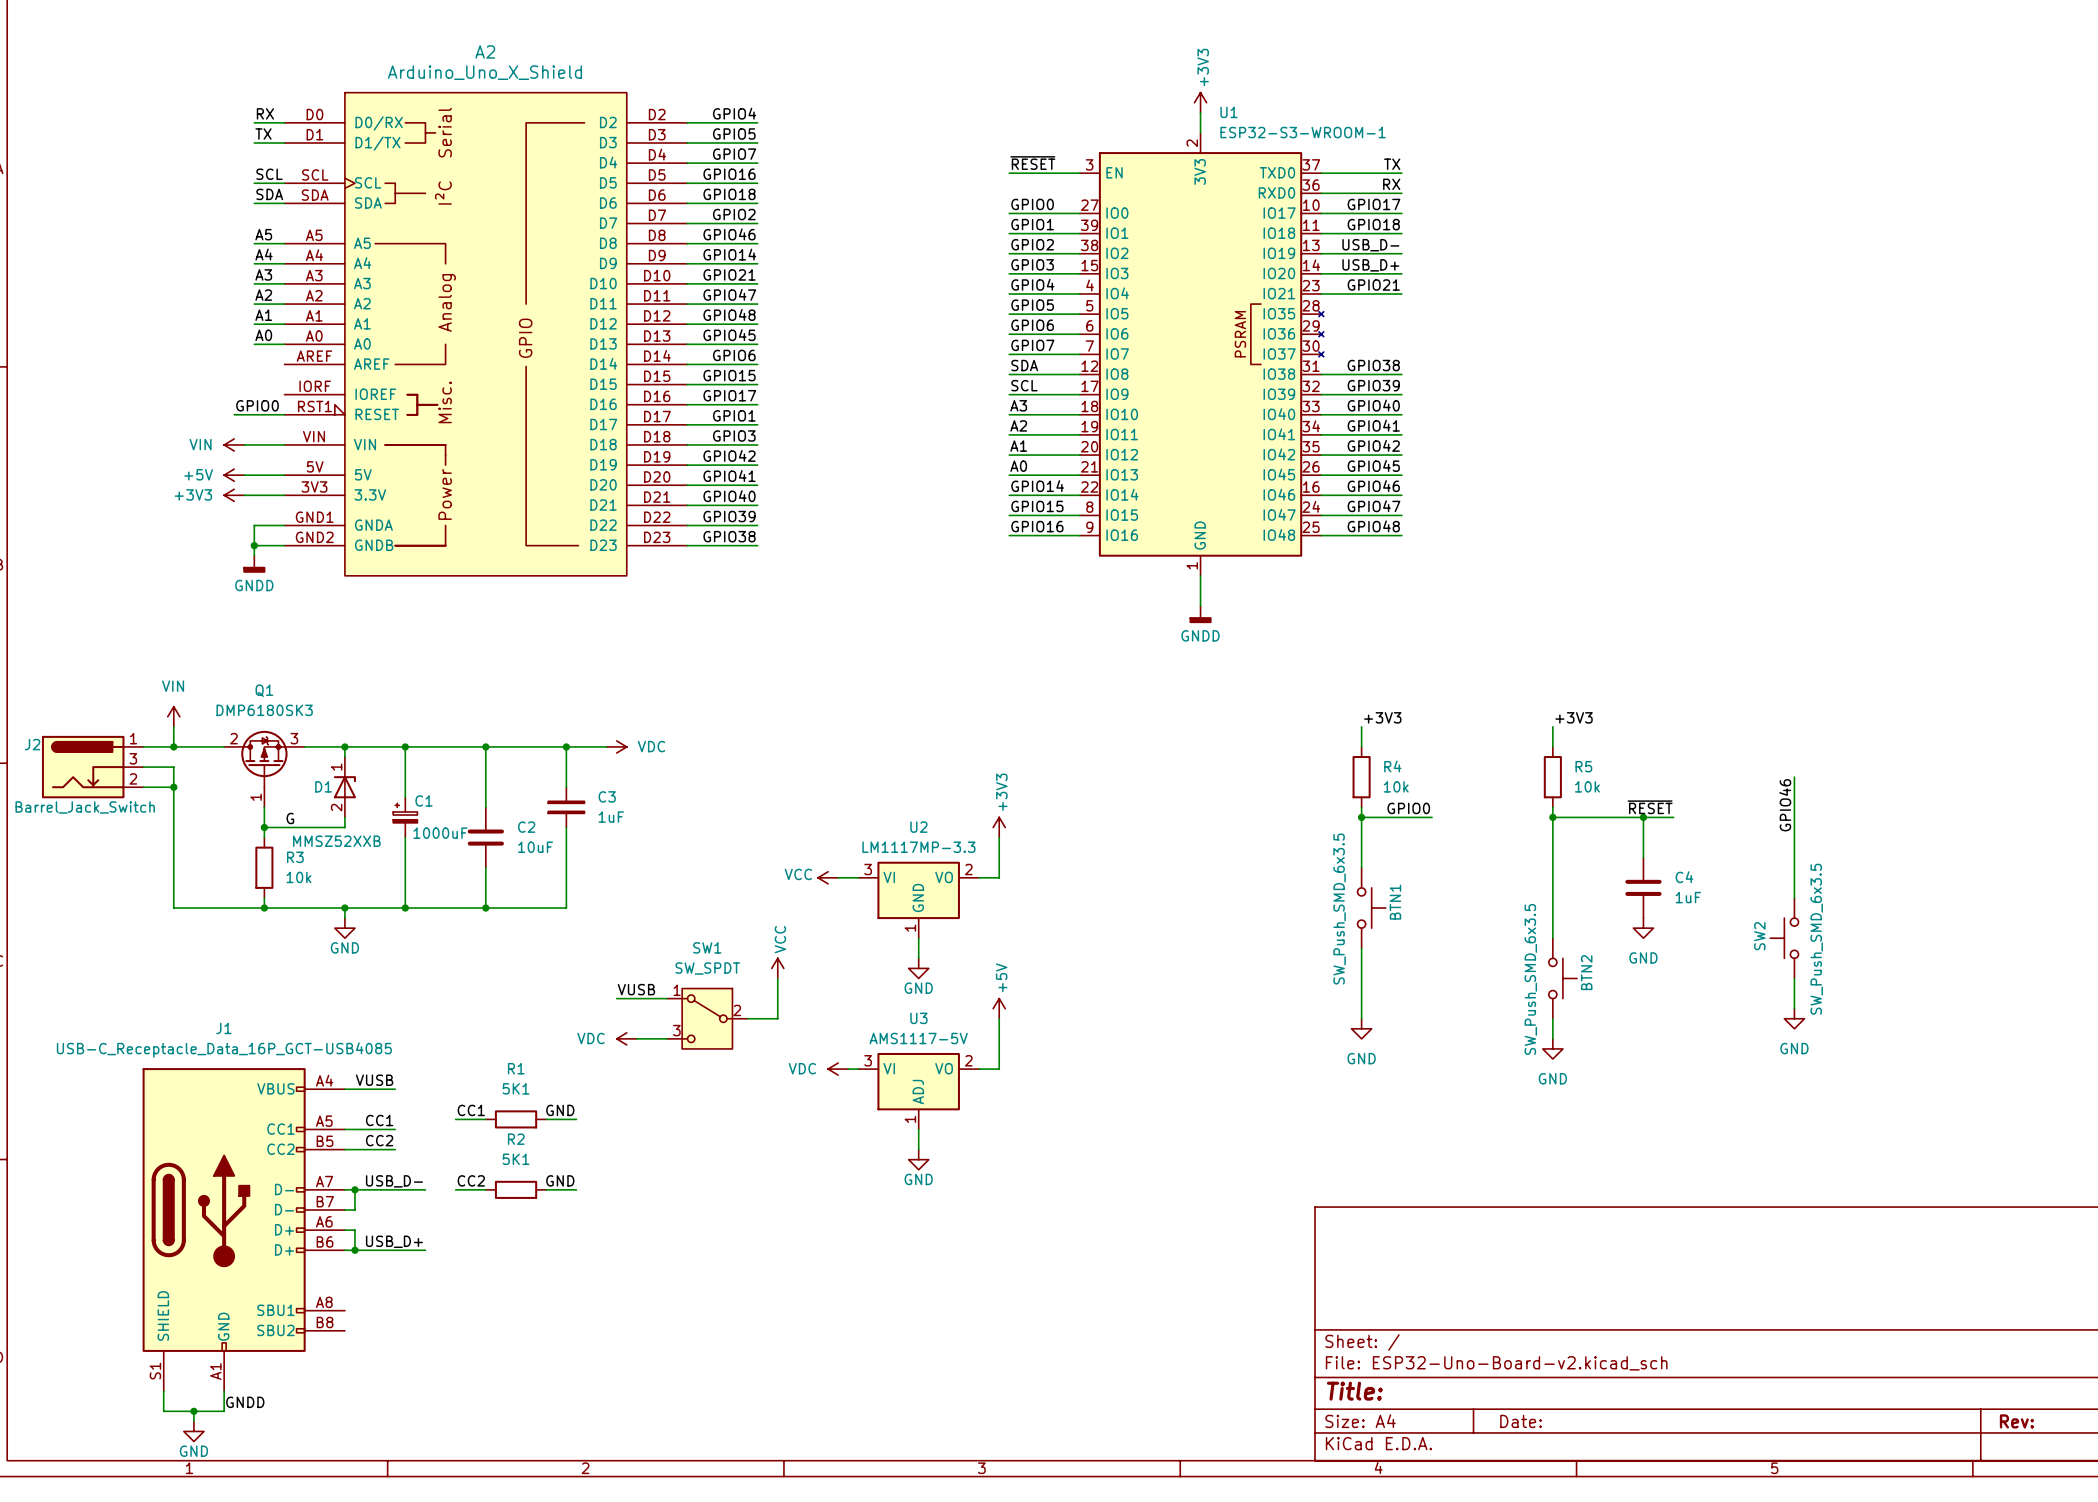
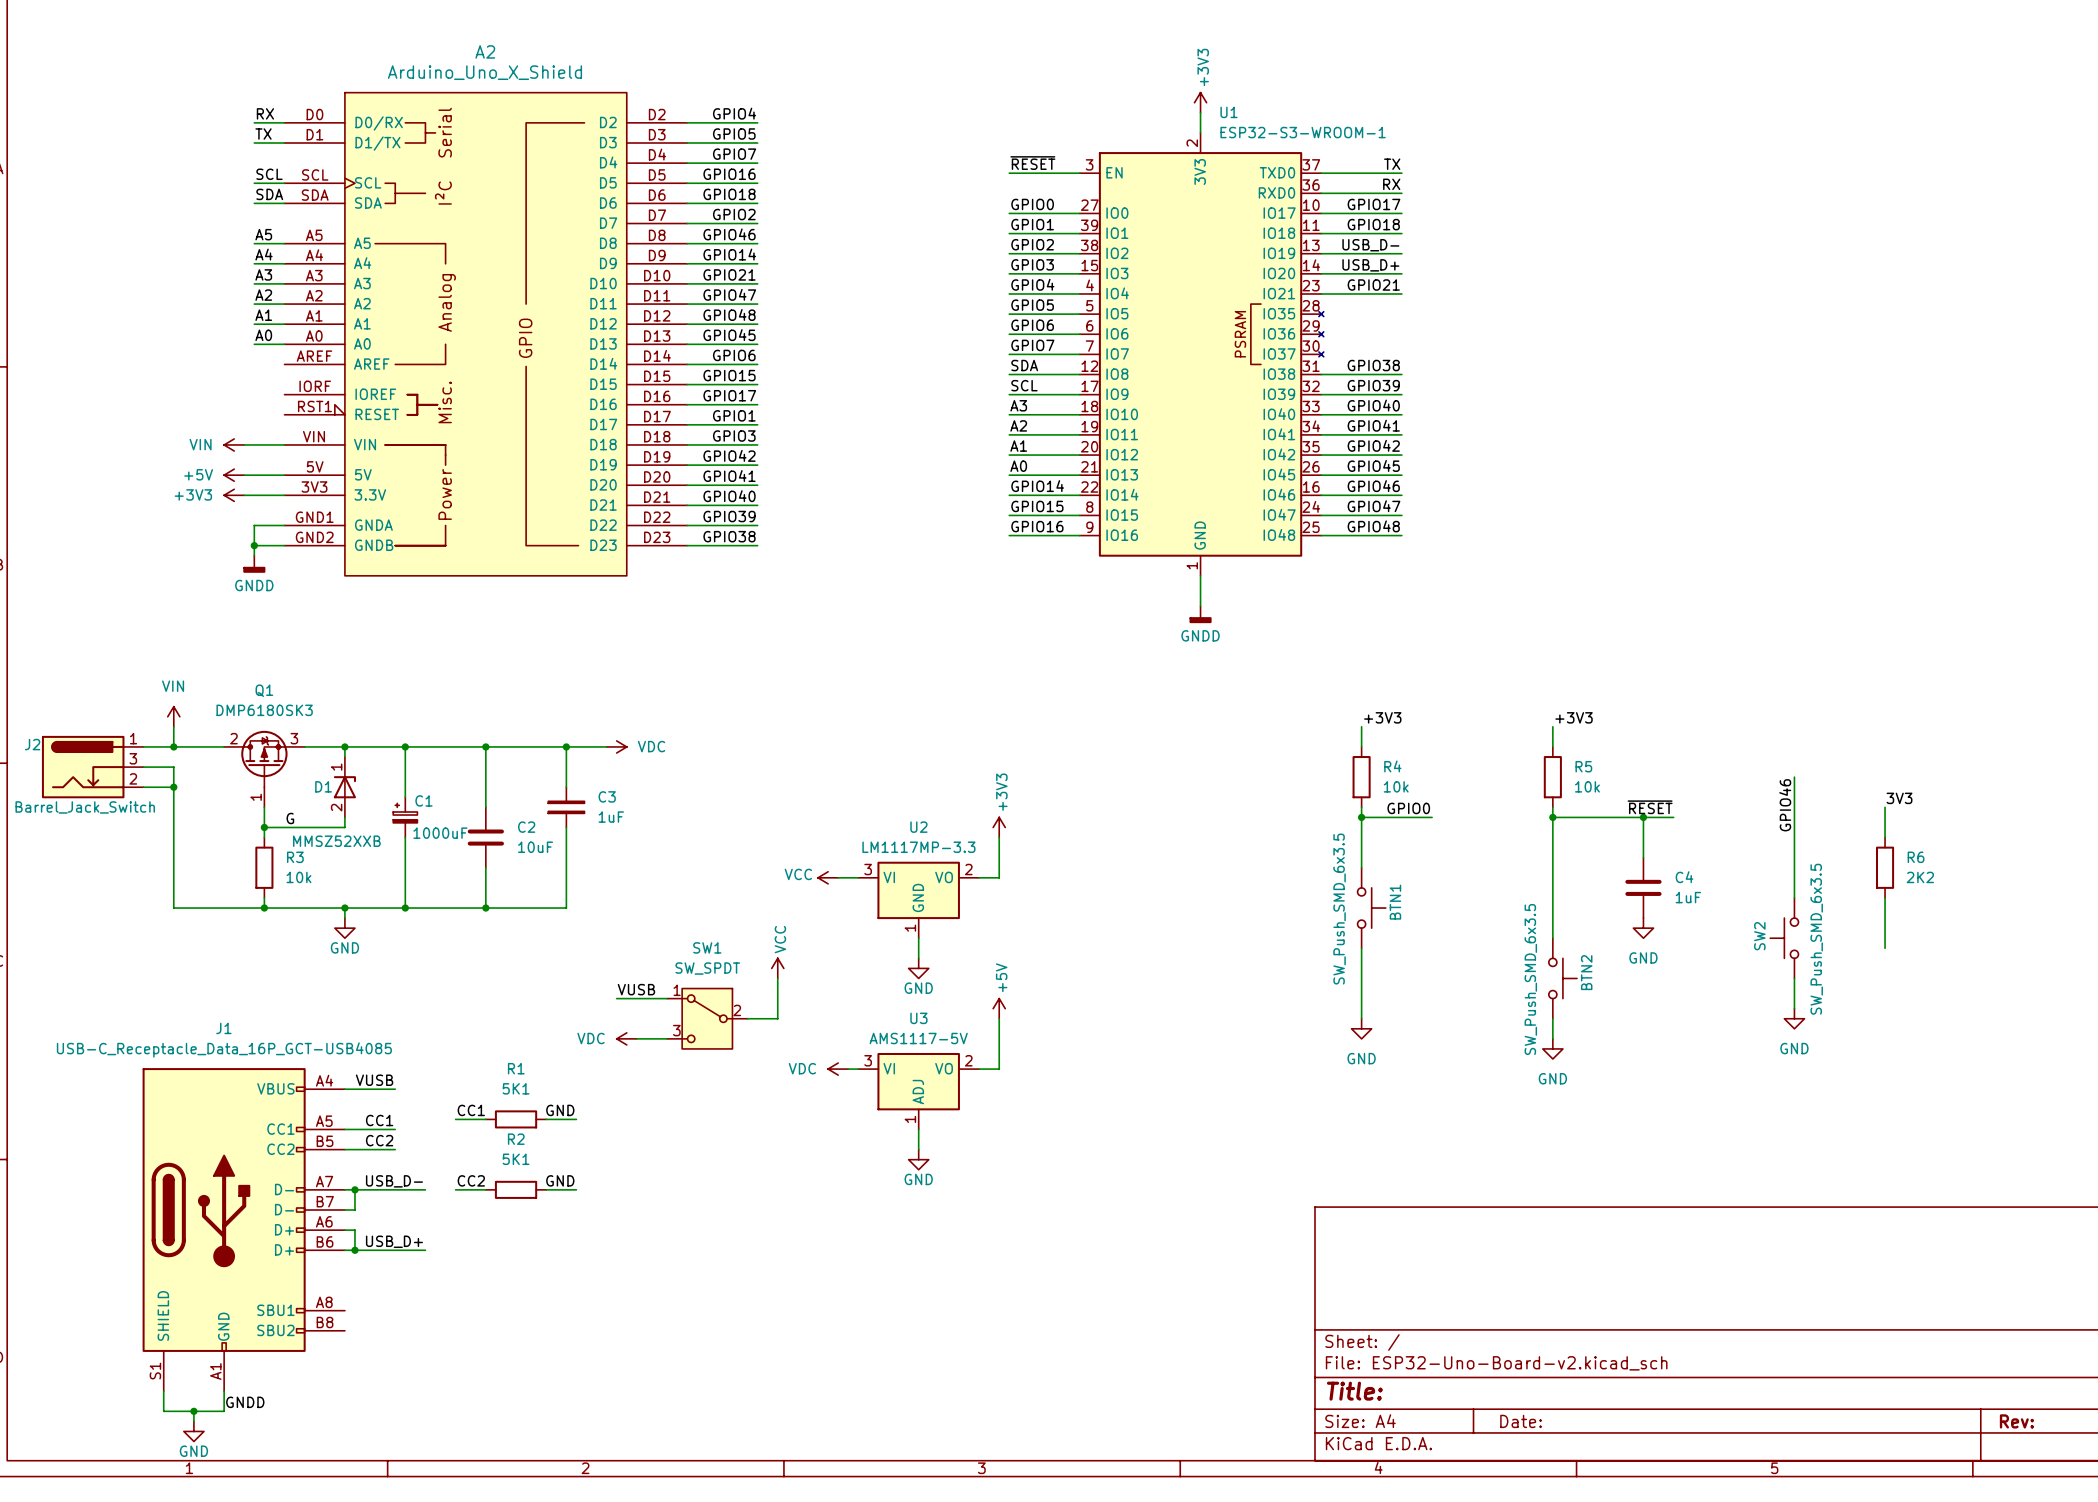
label: GPIO0 (257, 405) -> none
wire: (234, 414) (284, 414) -> none
label: none -> 3V3 (1899, 798)
wire: none -> (1885, 807) (1885, 837)
R6: none -> 2K2 (1885, 867)
wire: none -> (1885, 897) (1885, 948)

